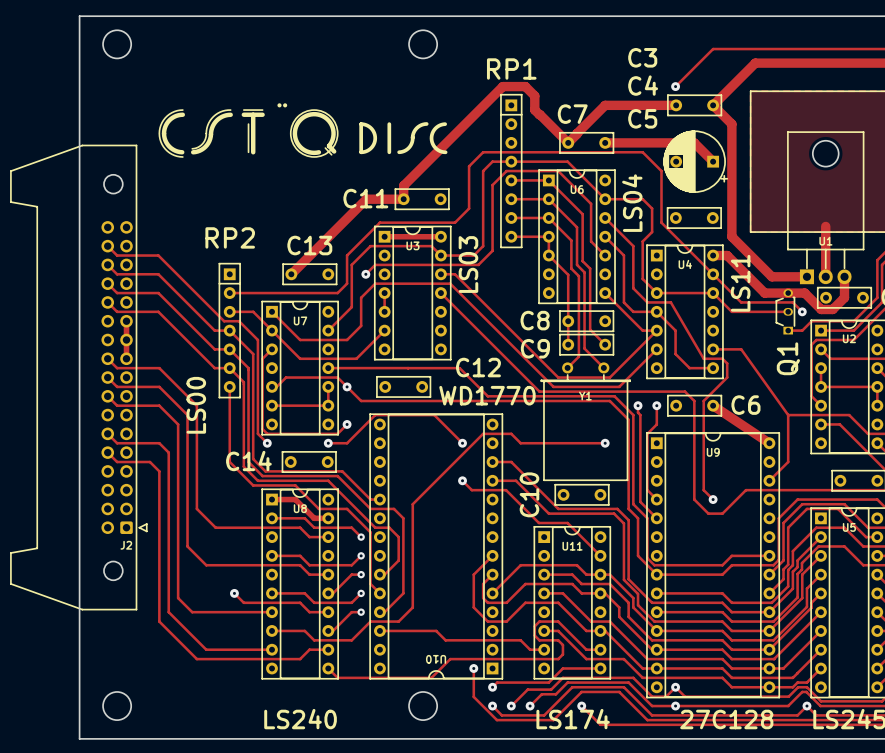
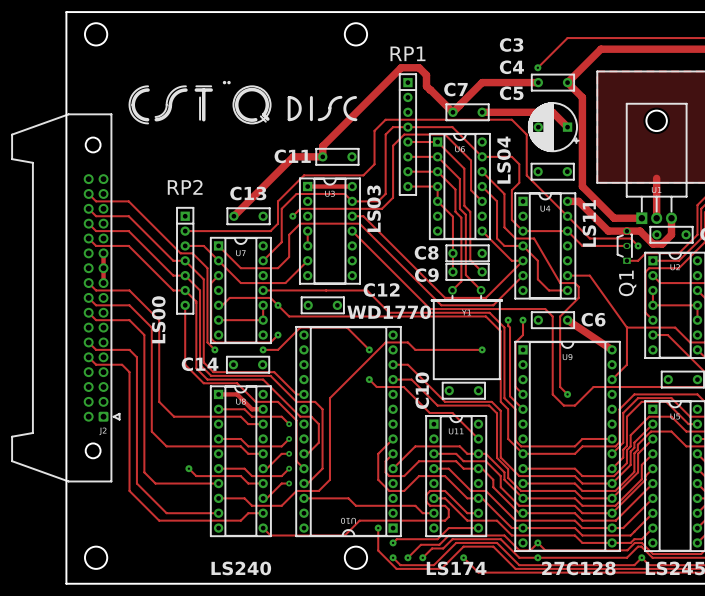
round board edge: [408, 30, 438, 59] -> none
round board edge: none -> [344, 23, 368, 46]
round board edge: [408, 691, 438, 721] -> none
round board edge: none -> [344, 546, 368, 570]

